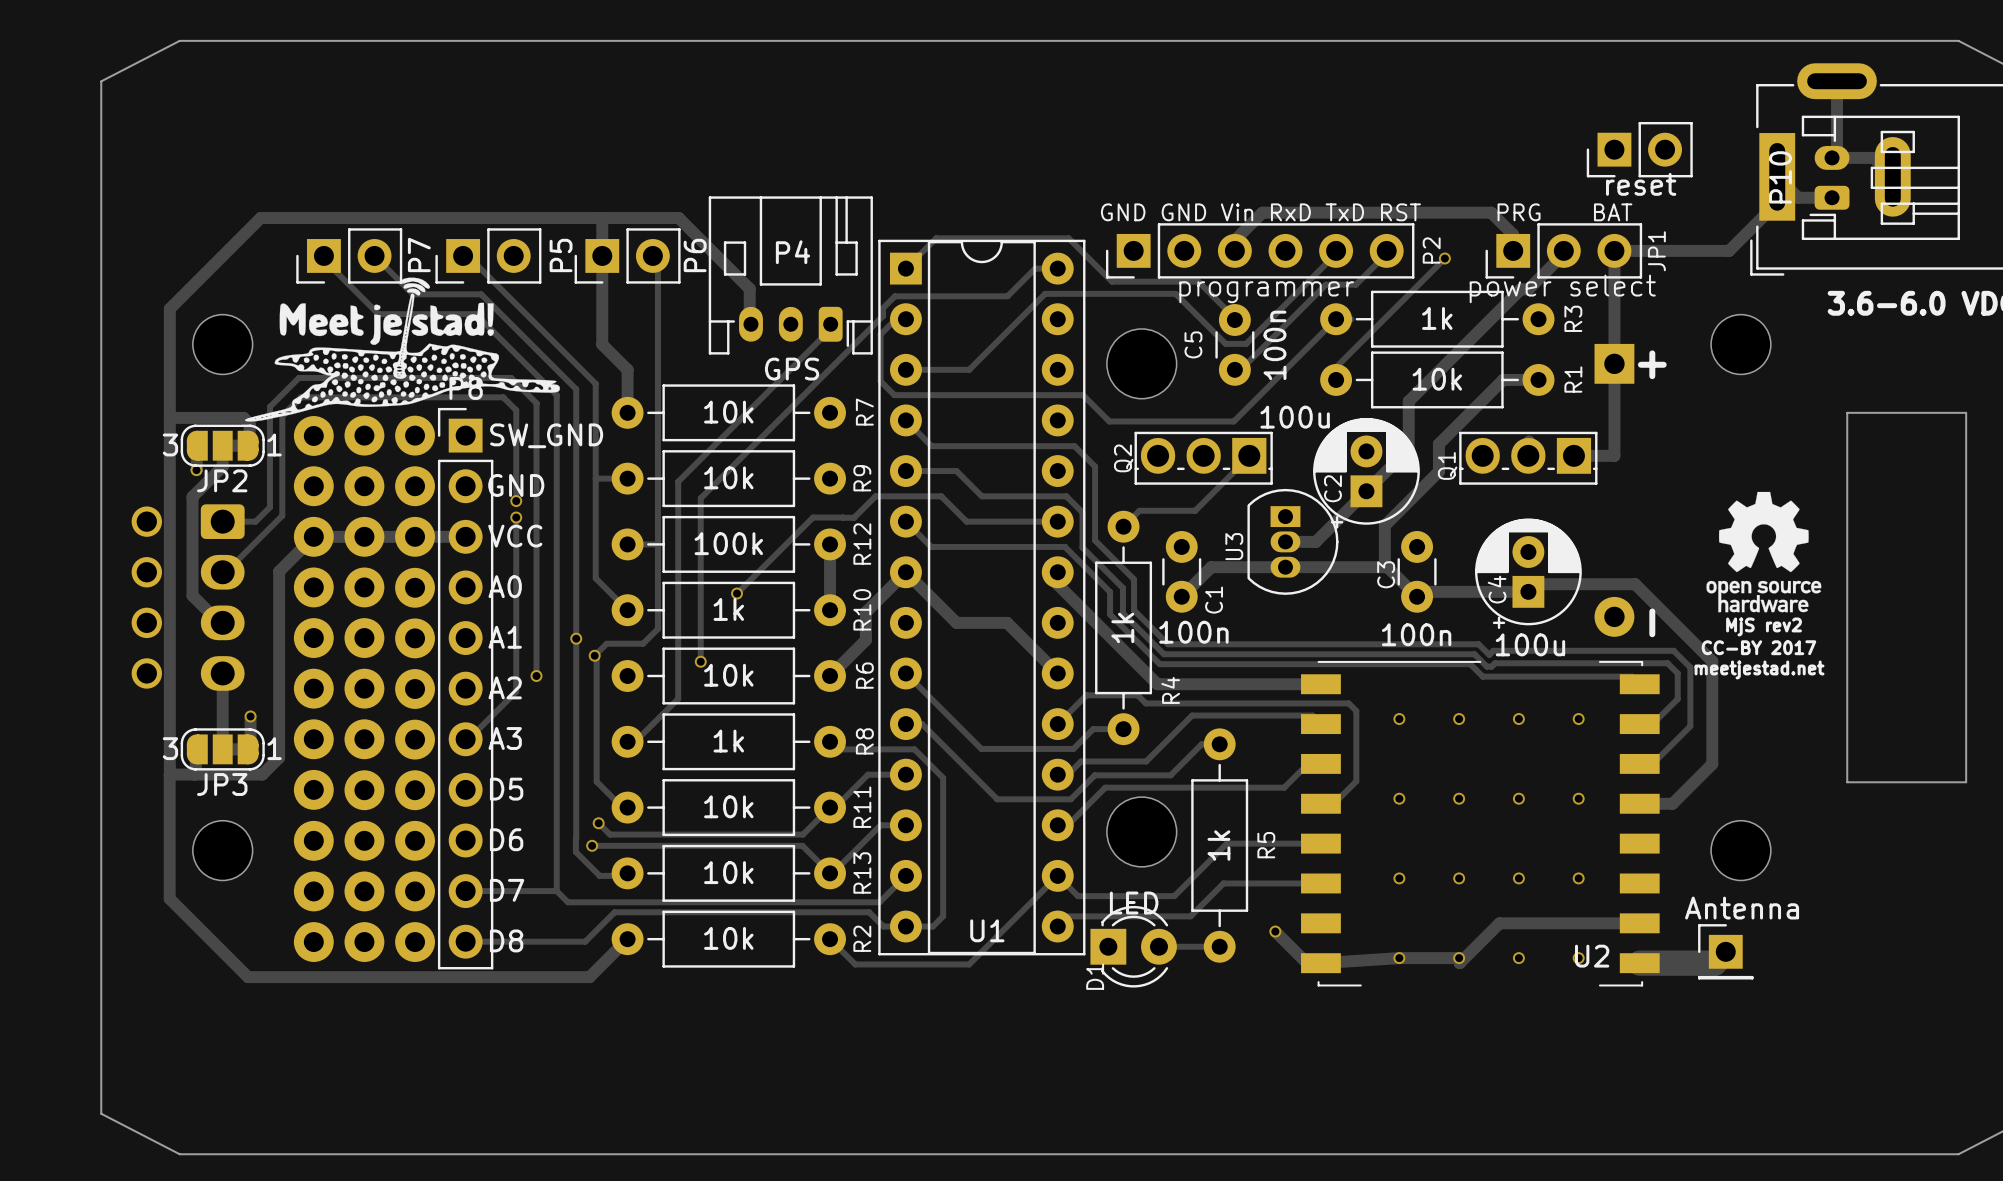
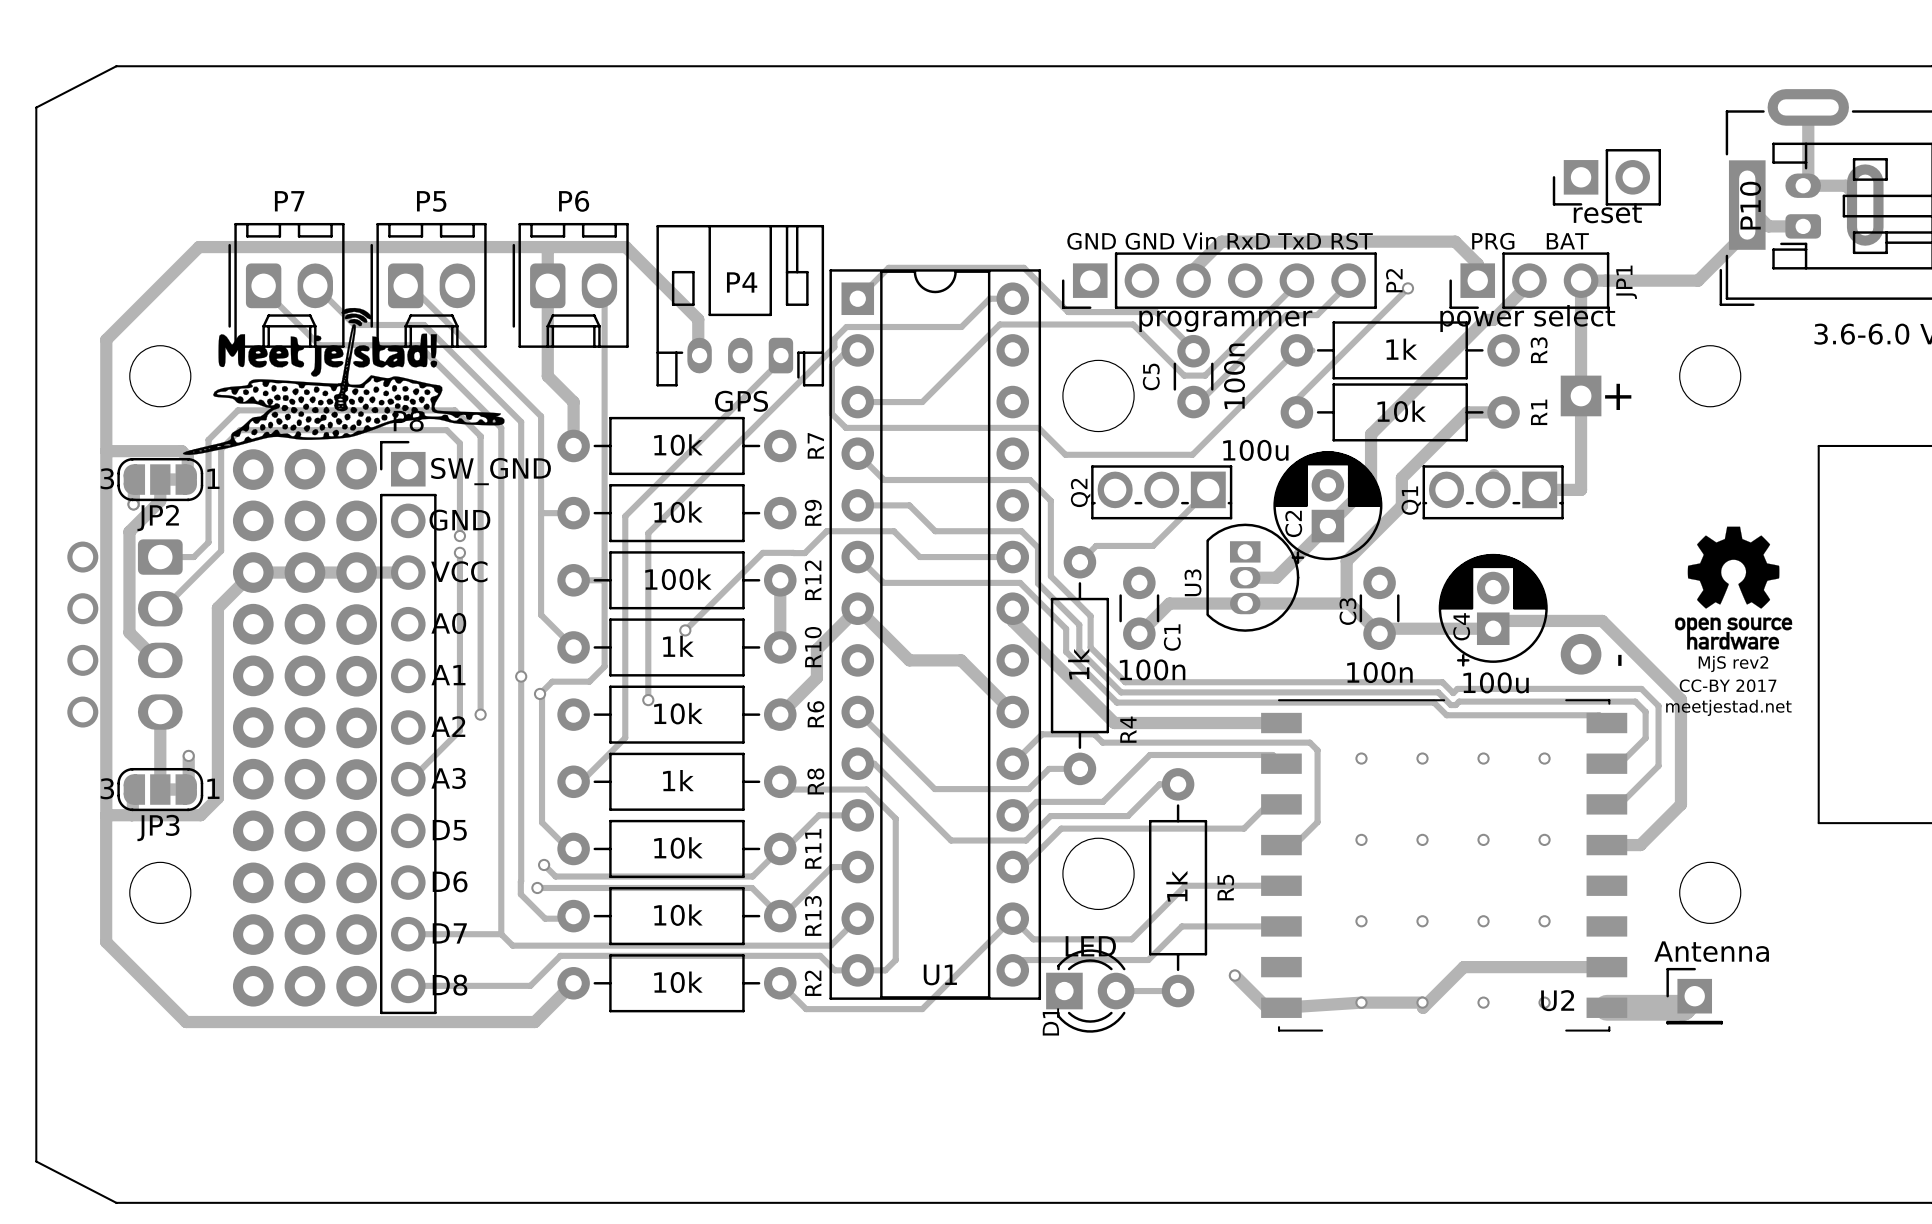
P7 footprint: [296, 228, 403, 284] -> [228, 222, 345, 348]
P5 footprint: [435, 228, 542, 284] -> [370, 222, 487, 348]
P6 footprint: [574, 228, 681, 284] -> [512, 222, 629, 348]
P7 name position: P7 (419, 255) -> P7 (289, 201)
P5 name position: P5 (561, 255) -> P5 (431, 201)
P6 name position: P6 (695, 255) -> P6 (574, 201)

